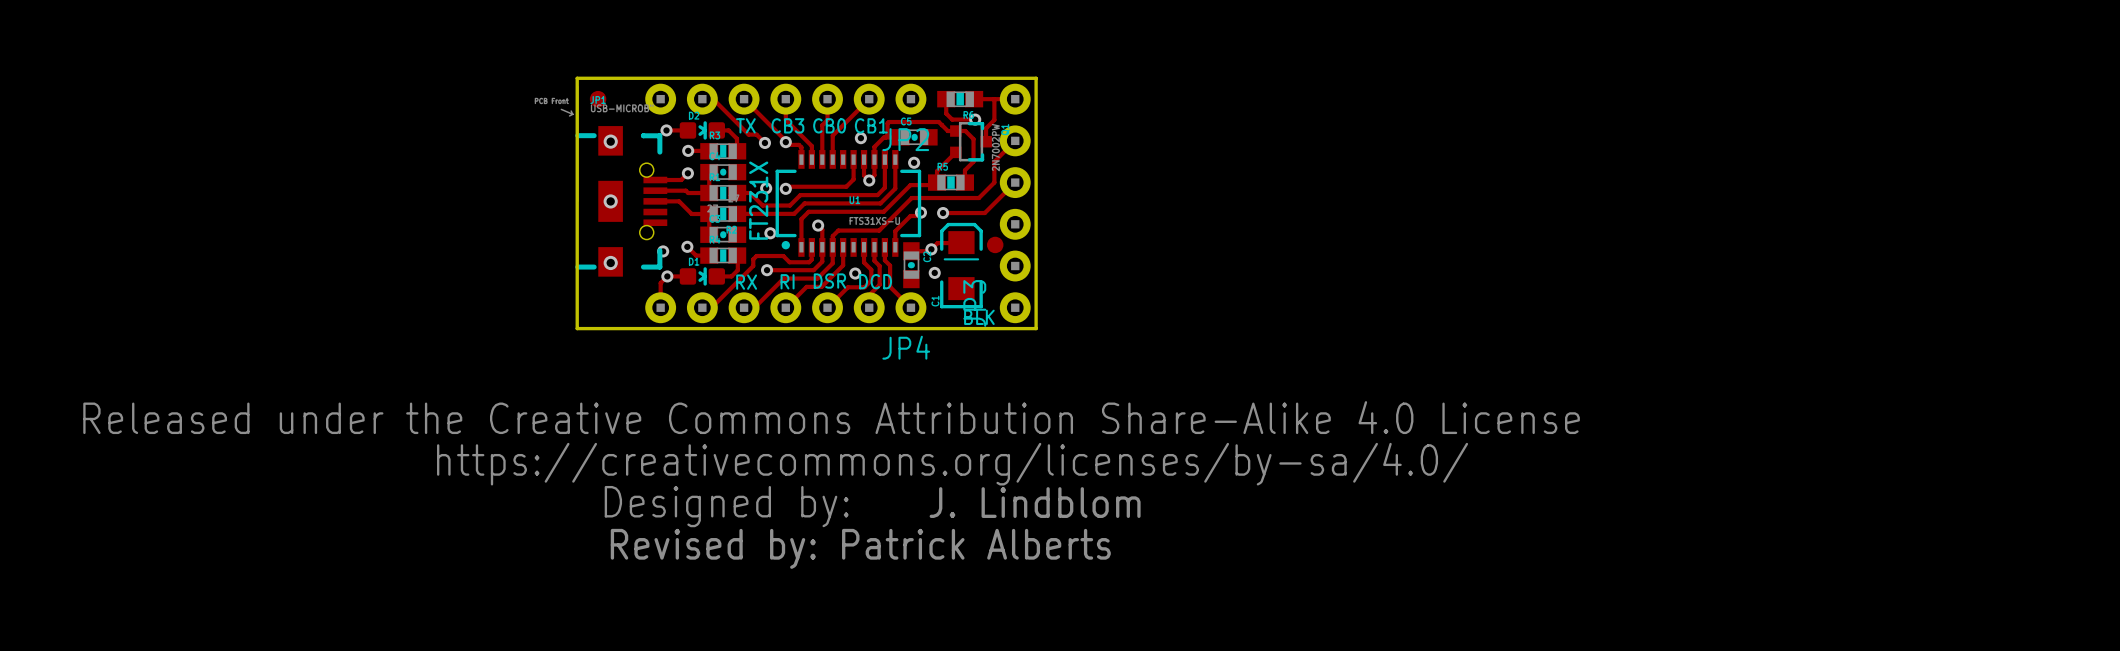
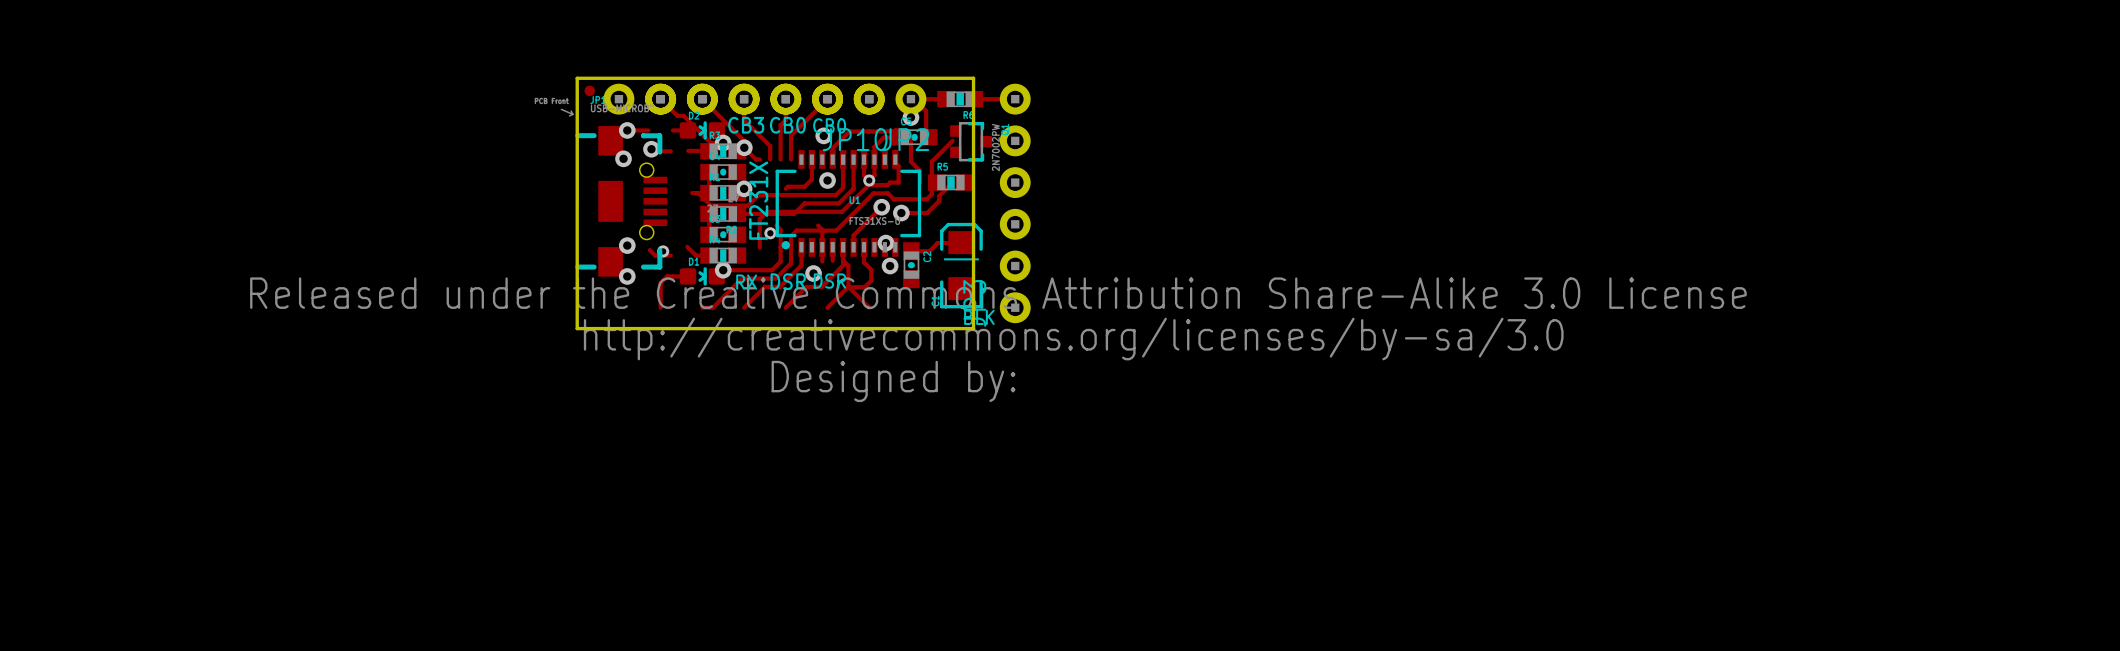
board edge: (973, 78) (1036, 78) (1036, 328) (973, 328) -> (973, 78) (973, 328)
part footprint: [589, 90, 607, 108] -> [584, 85, 595, 97]
track: none -> (660, 99) (677, 115) (683, 115) (710, 142) (723, 142)
track: (702, 99) (713, 99) (748, 134) (756, 134) (764, 142) -> (702, 99) (744, 141) (744, 147) (755, 159) (759, 159)
track: (744, 99) (788, 144) (798, 144) (801, 147) (801, 159) -> (744, 99) (744, 120) (770, 146) (770, 159)
JP10: none -> (744, 99)
track: (827, 99) (827, 120) (822, 125) (822, 159) -> (827, 99) (791, 135) (791, 159)
track: (869, 99) (832, 135) (832, 148) -> (919, 182) (919, 170) (910, 161) (910, 136) (904, 130) (849, 131) (832, 148)
track: (946, 99) (946, 113) (952, 119) (975, 119) -> none
track: none -> (952, 99) (921, 99) (921, 106) (926, 111) (926, 140)
track: (994, 99) (994, 120) (986, 128) (986, 141) -> none
via: none -> (910, 117)
via: (975, 119) -> none
track: (785, 120) (811, 146) (811, 159) -> (785, 120) (780, 125) (780, 159)
text: TX (745, 125) -> CB3 (746, 125)
text: CB3 (787, 125) -> CB0 (787, 125)
text: CB1 (871, 125) -> none
track: none -> (627, 130) (648, 130)
via: none -> (627, 130)
via: (666, 130) -> none
track: (716, 130) (728, 130) (737, 138) (737, 151) -> none
via: none -> (823, 135)
track: (885, 137) (887, 135) (888, 122) (938, 122) (947, 131) (965, 130) (973, 139) (973, 161) (964, 170) (964, 182) -> none
via: (860, 138) -> none
track: (1015, 140) (994, 161) (994, 182) (978, 198) (911, 198) (879, 230) (838, 230) (832, 236) (832, 247) -> none
via: (610, 141) -> none
via: none -> (723, 142)
via: (764, 142) -> none
via: (785, 142) -> none
via: none -> (744, 147)
track: none -> (651, 149) (653, 151) (670, 151)
via: none -> (651, 149)
via: (688, 150) -> none
track: (955, 152) (937, 171) (937, 182) (931, 182) (929, 185) (910, 185) (883, 211) (842, 211) -> (895, 151) (895, 163) (898, 166) (898, 182) (890, 182) (887, 185) (868, 185) (842, 211)
via: none -> (623, 158)
track: none -> (811, 159) (811, 179) (804, 186)
track: (884, 159) (884, 187) (877, 195) (835, 195) -> (843, 159) (843, 187) (835, 195)
track: (895, 159) (895, 188) (880, 203) (838, 203) -> none
via: (914, 162) -> none
track: (687, 173) (681, 180) (655, 180) -> none
via: (687, 173) -> none
track: (853, 179) (846, 186) (804, 186) -> (853, 179) (853, 188) (838, 203)
via: none -> (827, 180)
track: none -> (952, 182) (939, 195) (939, 200) (927, 213) (901, 213)
track: (1015, 182) (984, 213) (943, 213) -> none
via: none -> (744, 188)
via: (766, 188) -> none
via: (785, 188) -> none
track: (655, 190) (685, 190) (692, 193) -> none
track: (737, 193) (750, 192) (762, 205) (789, 205) (800, 195) -> (698, 193) (710, 205) (748, 205) (758, 195) (800, 195)
via: (610, 201) -> none
track: (655, 201) (679, 201) (691, 214) (709, 214) -> none
track: none -> (881, 207) (853, 235) (853, 247)
via: none -> (881, 207)
track: (808, 211) (801, 219) (801, 247) -> (808, 211) (767, 211) (759, 219) (759, 247)
track: (920, 212) (917, 216) (910, 216) (895, 231) (895, 247) -> none
via: (920, 212) -> none
via: none -> (901, 213)
via: (943, 213) -> none
via: (818, 225) -> none
via: none -> (885, 243)
part: (995, 244) -> none
via: none -> (627, 245)
via: (687, 246) -> none
track: (811, 247) (811, 259) (809, 262) (789, 262) (783, 256) (756, 256) (753, 259) (753, 266) (711, 307) -> (952, 140) (931, 161) (931, 194) (926, 199) (893, 199) (888, 193) (873, 193) (836, 230) (796, 230) (791, 236) (791, 263) (775, 278) (742, 278) (711, 307)
track: (874, 247) (874, 260) (879, 266) (879, 284) (869, 295) (869, 307) -> (843, 260) (848, 265) (848, 286) (869, 307)
track: (884, 247) (884, 260) (890, 265) (890, 286) (910, 307) -> none
via: (931, 249) -> none
track: none -> (649, 250) (655, 255) (670, 255)
track: (735, 257) (737, 256) (737, 270) (731, 276) (716, 276) -> none
track: (832, 260) (832, 263) (817, 278) (783, 278) (754, 307) (744, 307) -> (801, 247) (801, 265) (779, 286) (764, 286) (744, 307)
track: (822, 261) (813, 270) (772, 270) -> (776, 225) (780, 229) (780, 261) (772, 270)
via: (610, 262) -> none
via: none -> (890, 266)
track: none -> (723, 270) (767, 270)
via: none -> (723, 270)
via: (767, 270) -> none
via: (934, 272) -> none
via: none -> (813, 273)
via: (855, 273) -> none
via: none -> (627, 276)
via: (667, 276) -> none
drawing: none -> [250, 277, 1747, 403]
text: RI (787, 281) -> DSR (788, 281)
text: DCD (875, 281) -> none
JP4: (785, 307) -> none
drawing: [83, 401, 1580, 528] -> none
text: J. Lindblom (1035, 502) -> none
text: Revised by: Patrick Alberts (860, 548) -> none

